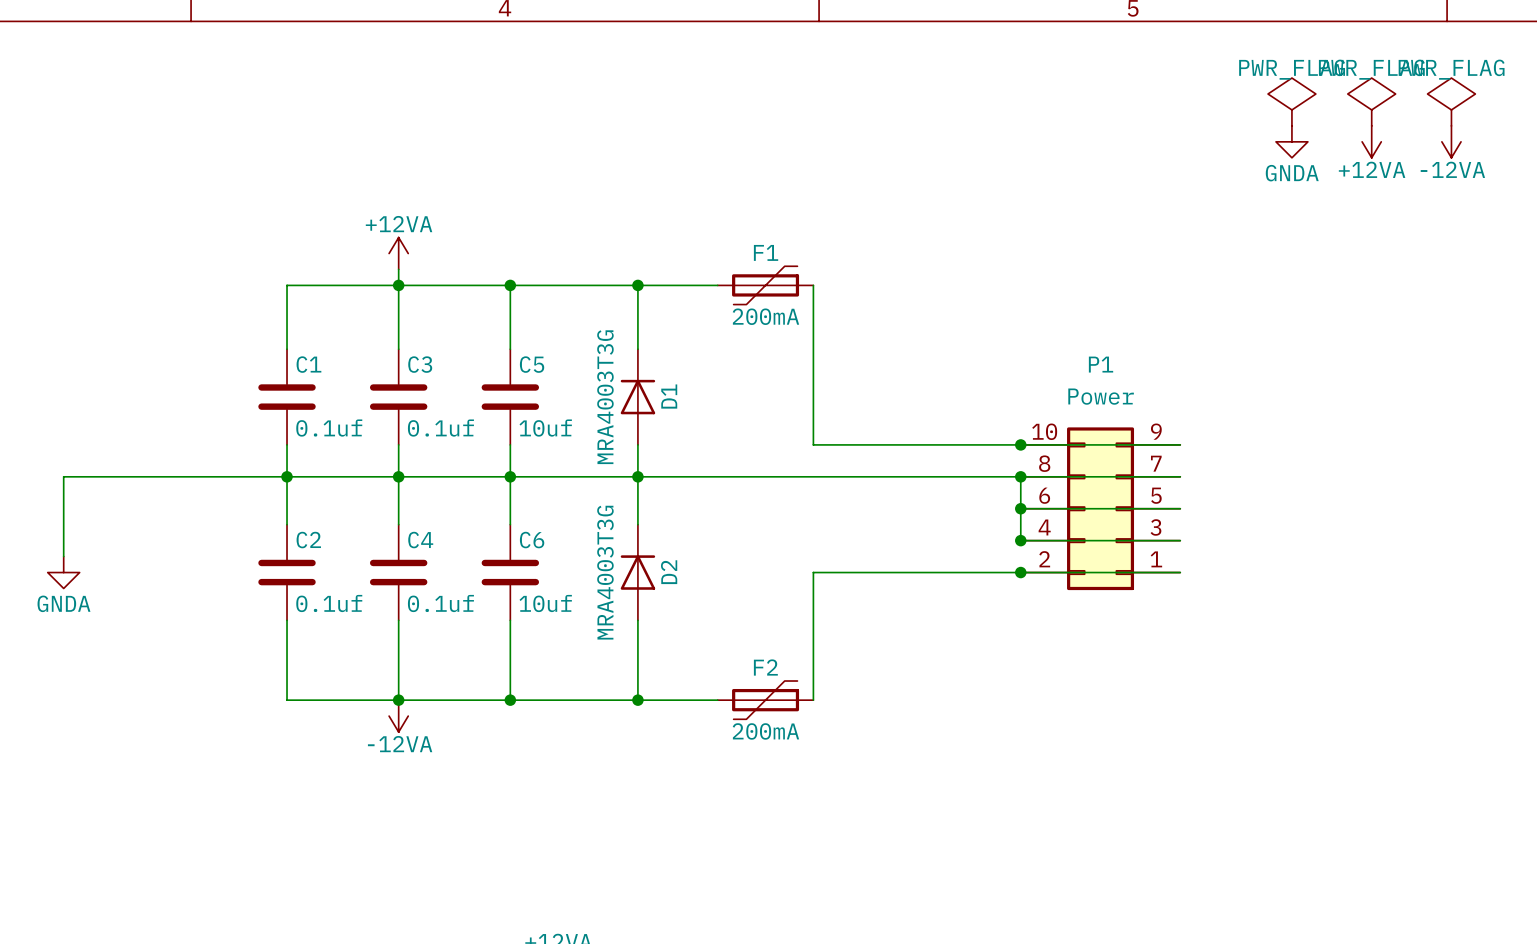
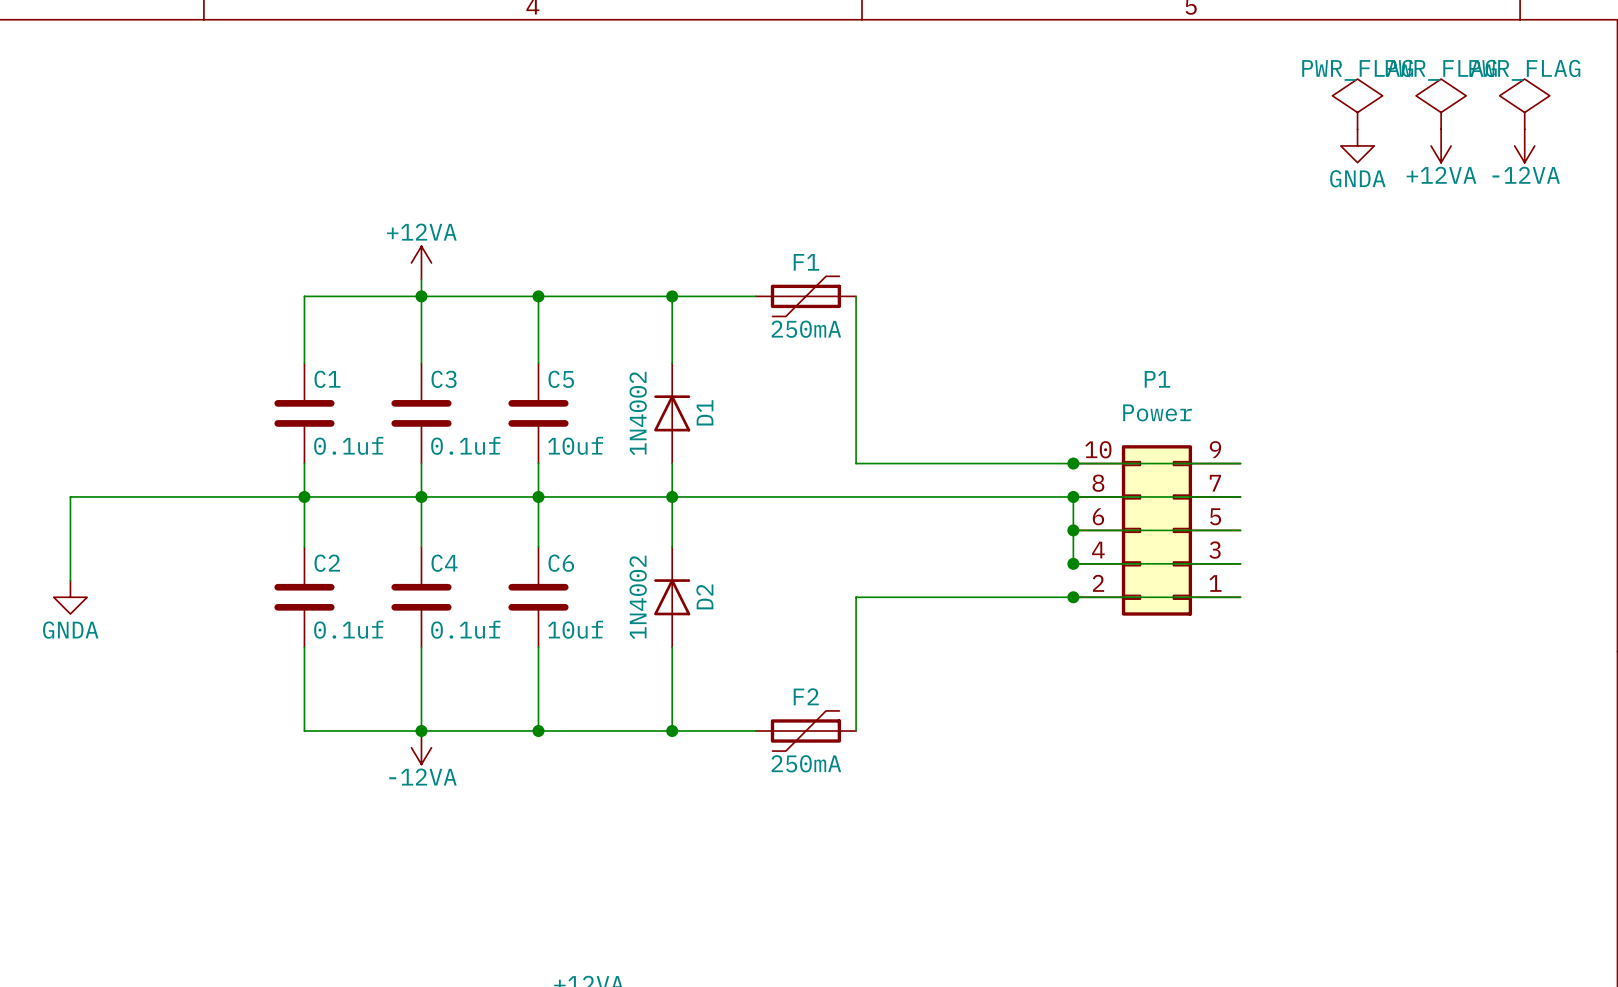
F1 value: 200mA (765, 316) -> 250mA (806, 329)
D1 value: MRA4003T3G (605, 397) -> 1N4002 (638, 413)
D2 value: MRA4003T3G (605, 572) -> 1N4002 (638, 597)
F2 value: 200mA (765, 731) -> 250mA (806, 763)

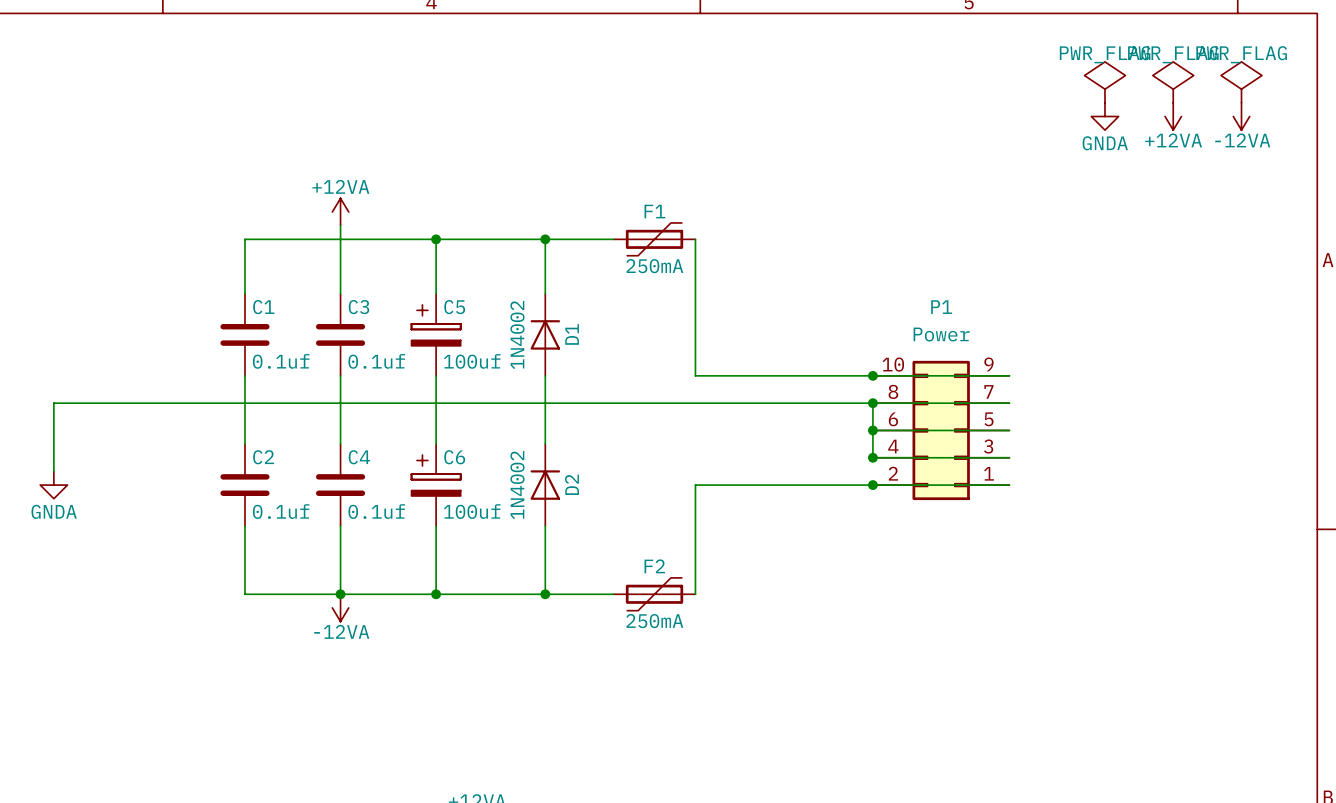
junction: (421, 296) -> none
C5 symbol: [508, 363, 569, 464] -> [411, 293, 461, 376]
C5 value: 10uf (575, 445) -> 100uf (472, 361)
junction: (304, 496) -> none
junction: (421, 496) -> none
junction: (538, 496) -> none
junction: (672, 496) -> none
C6 symbol: [508, 547, 569, 648] -> [411, 444, 461, 527]
C6 value: 10uf (575, 629) -> 100uf (472, 511)

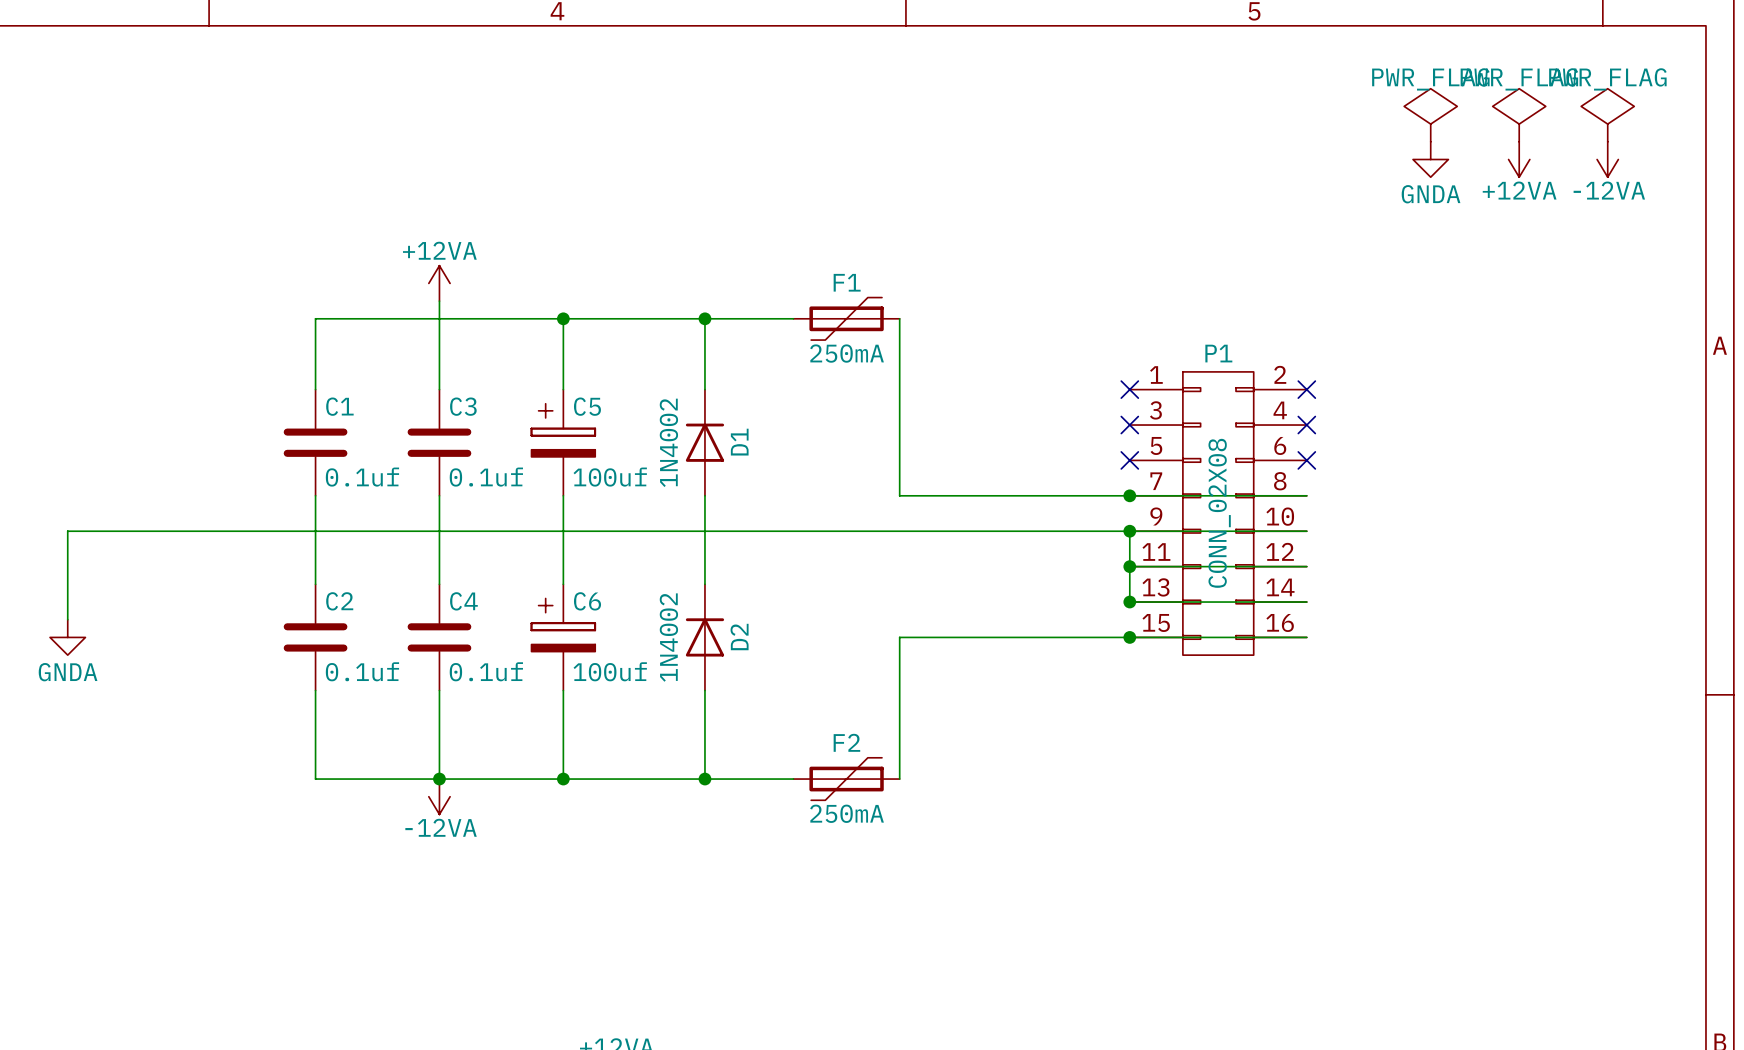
no-connect mark: none -> (1129, 389)
no-connect mark: none -> (1306, 389)
no-connect mark: none -> (1129, 425)
no-connect mark: none -> (1306, 425)
P1 value: Power (941, 334) -> CONN_02X08 (1219, 513)
no-connect mark: none -> (1129, 460)
no-connect mark: none -> (1306, 460)
P1 symbol: [872, 360, 1010, 501] -> [1129, 371, 1307, 656]

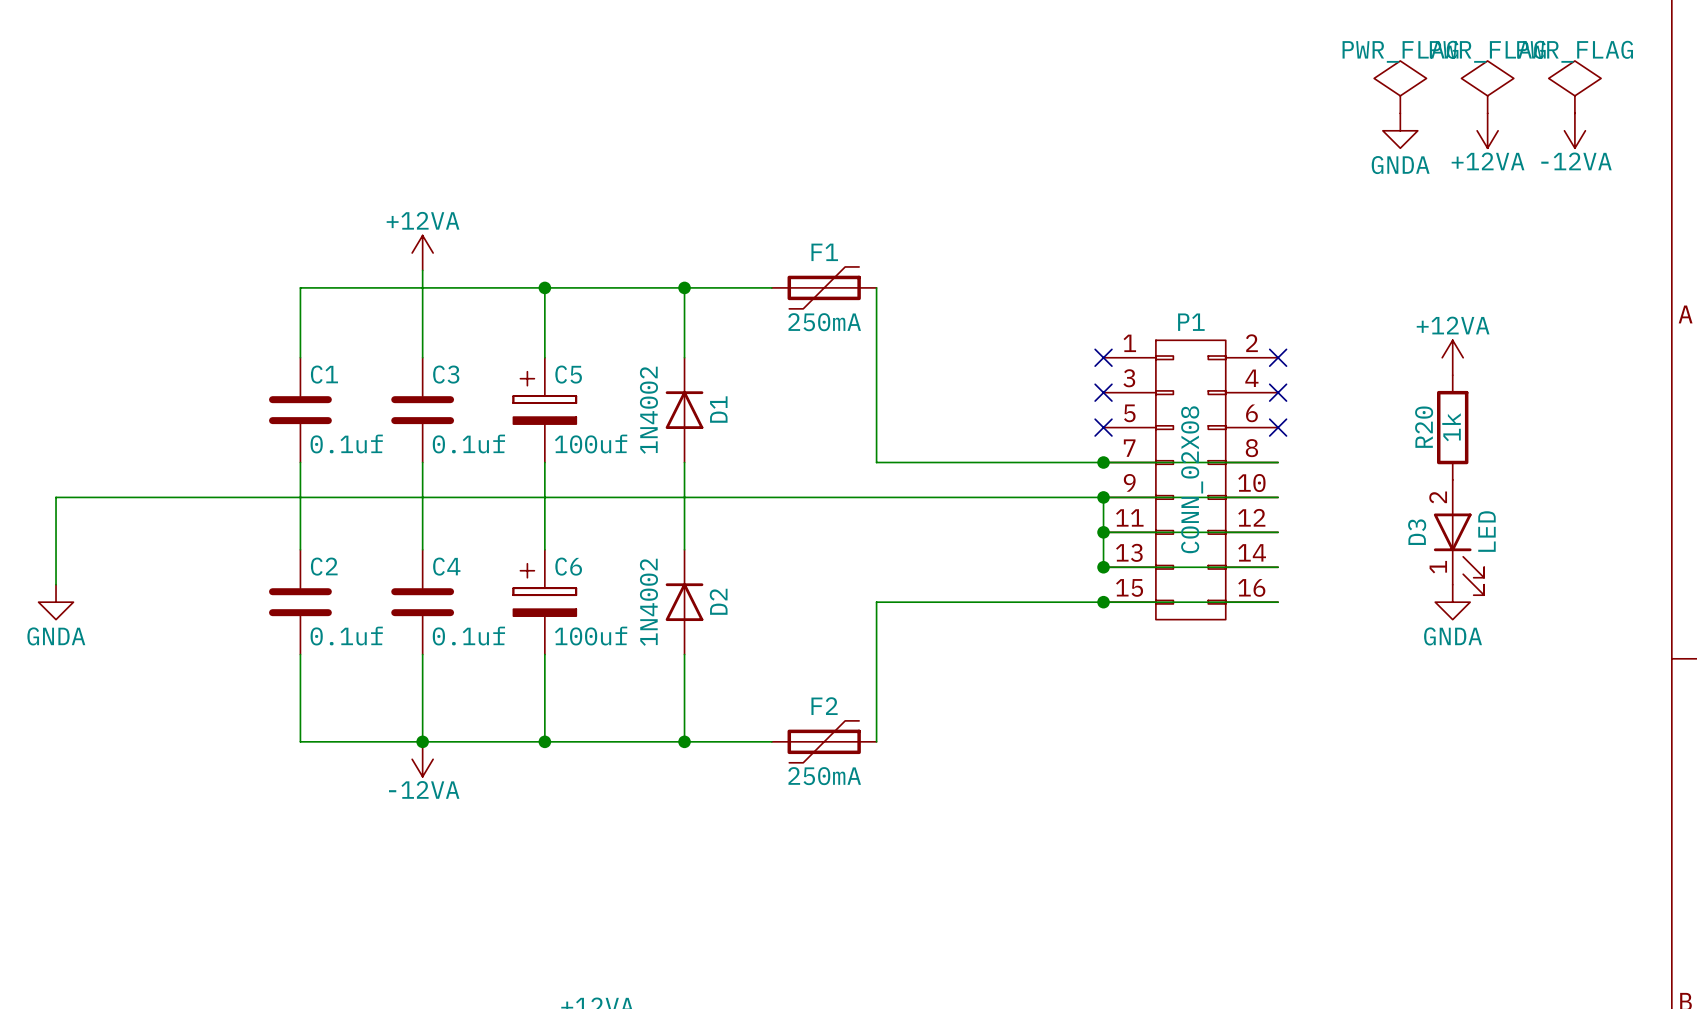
power symbol: none -> +12VA (1452, 357)
R20: none -> 1k (1452, 427)
D3: none -> LED (1459, 537)
power symbol: none -> GNDA (1452, 602)

